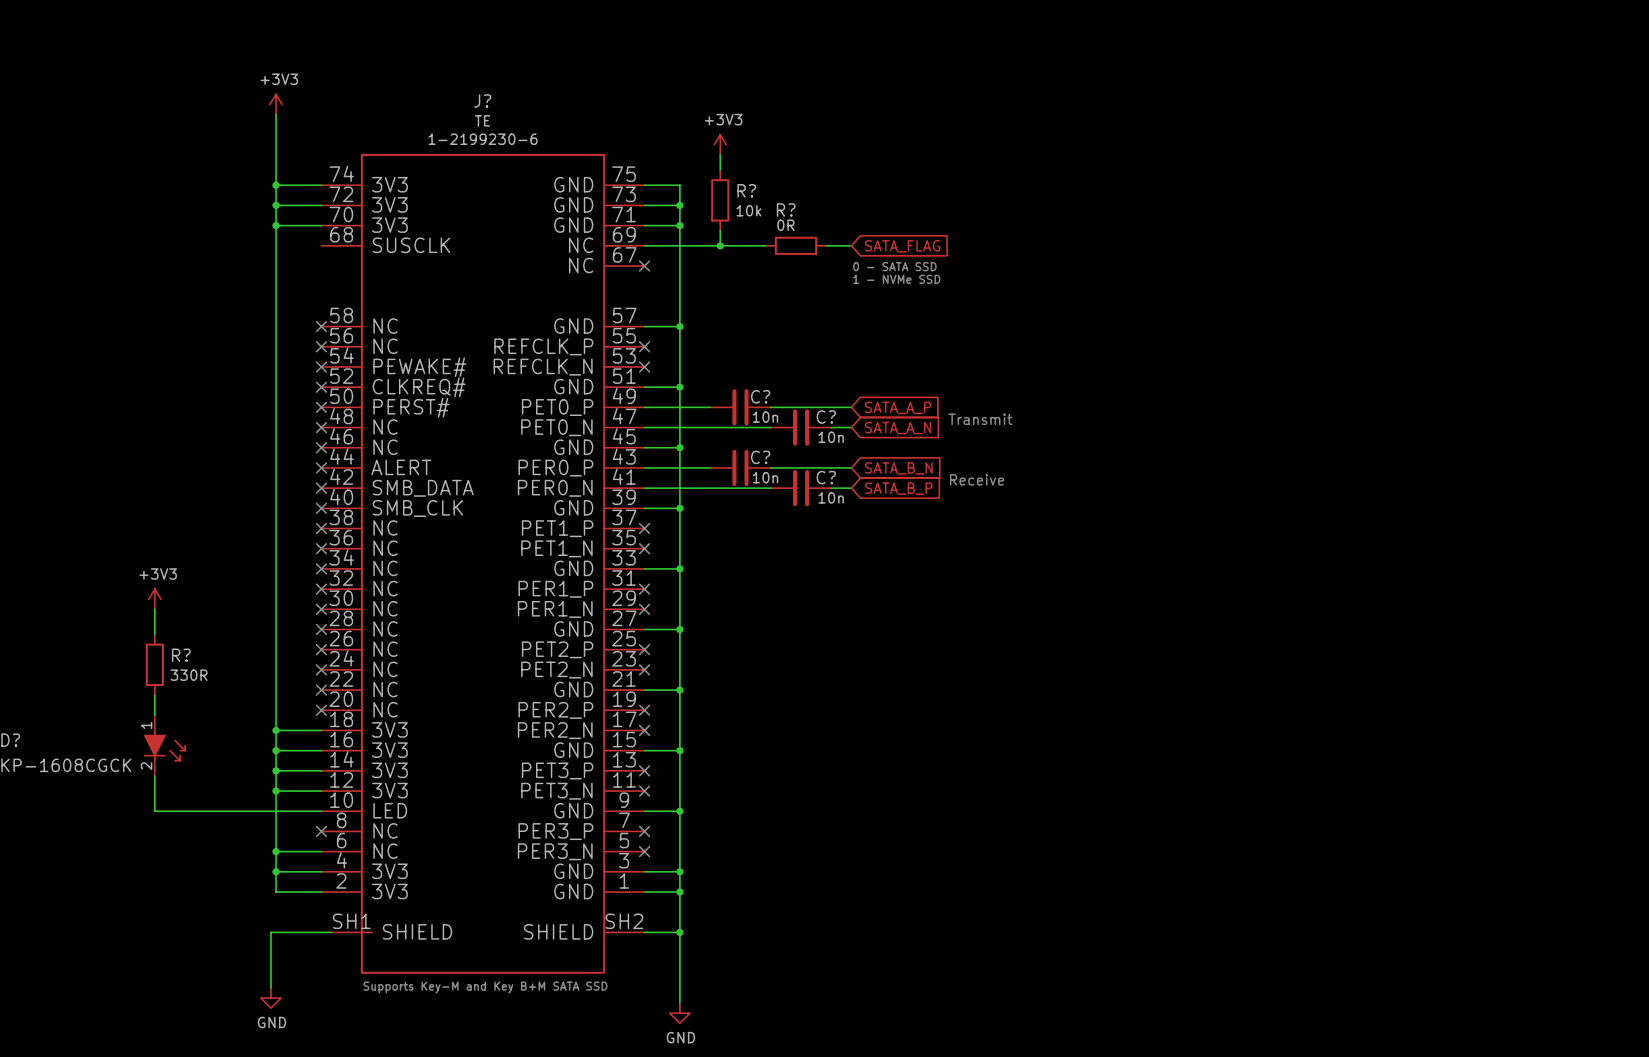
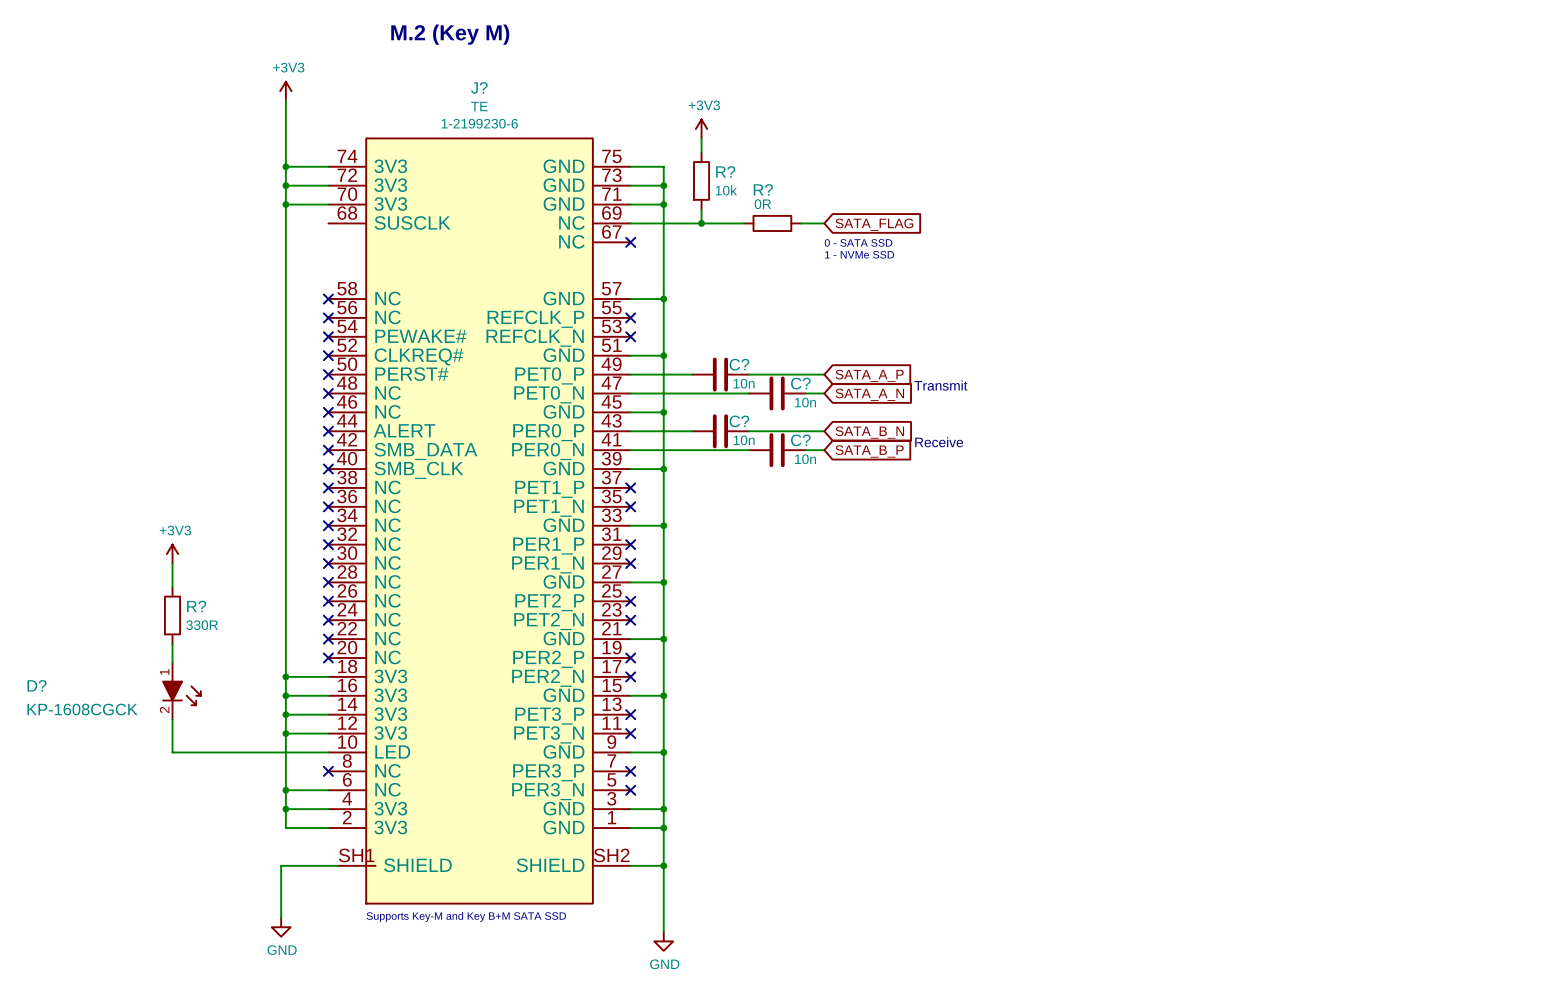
text: none -> M.2 (Key M) (450, 34)

